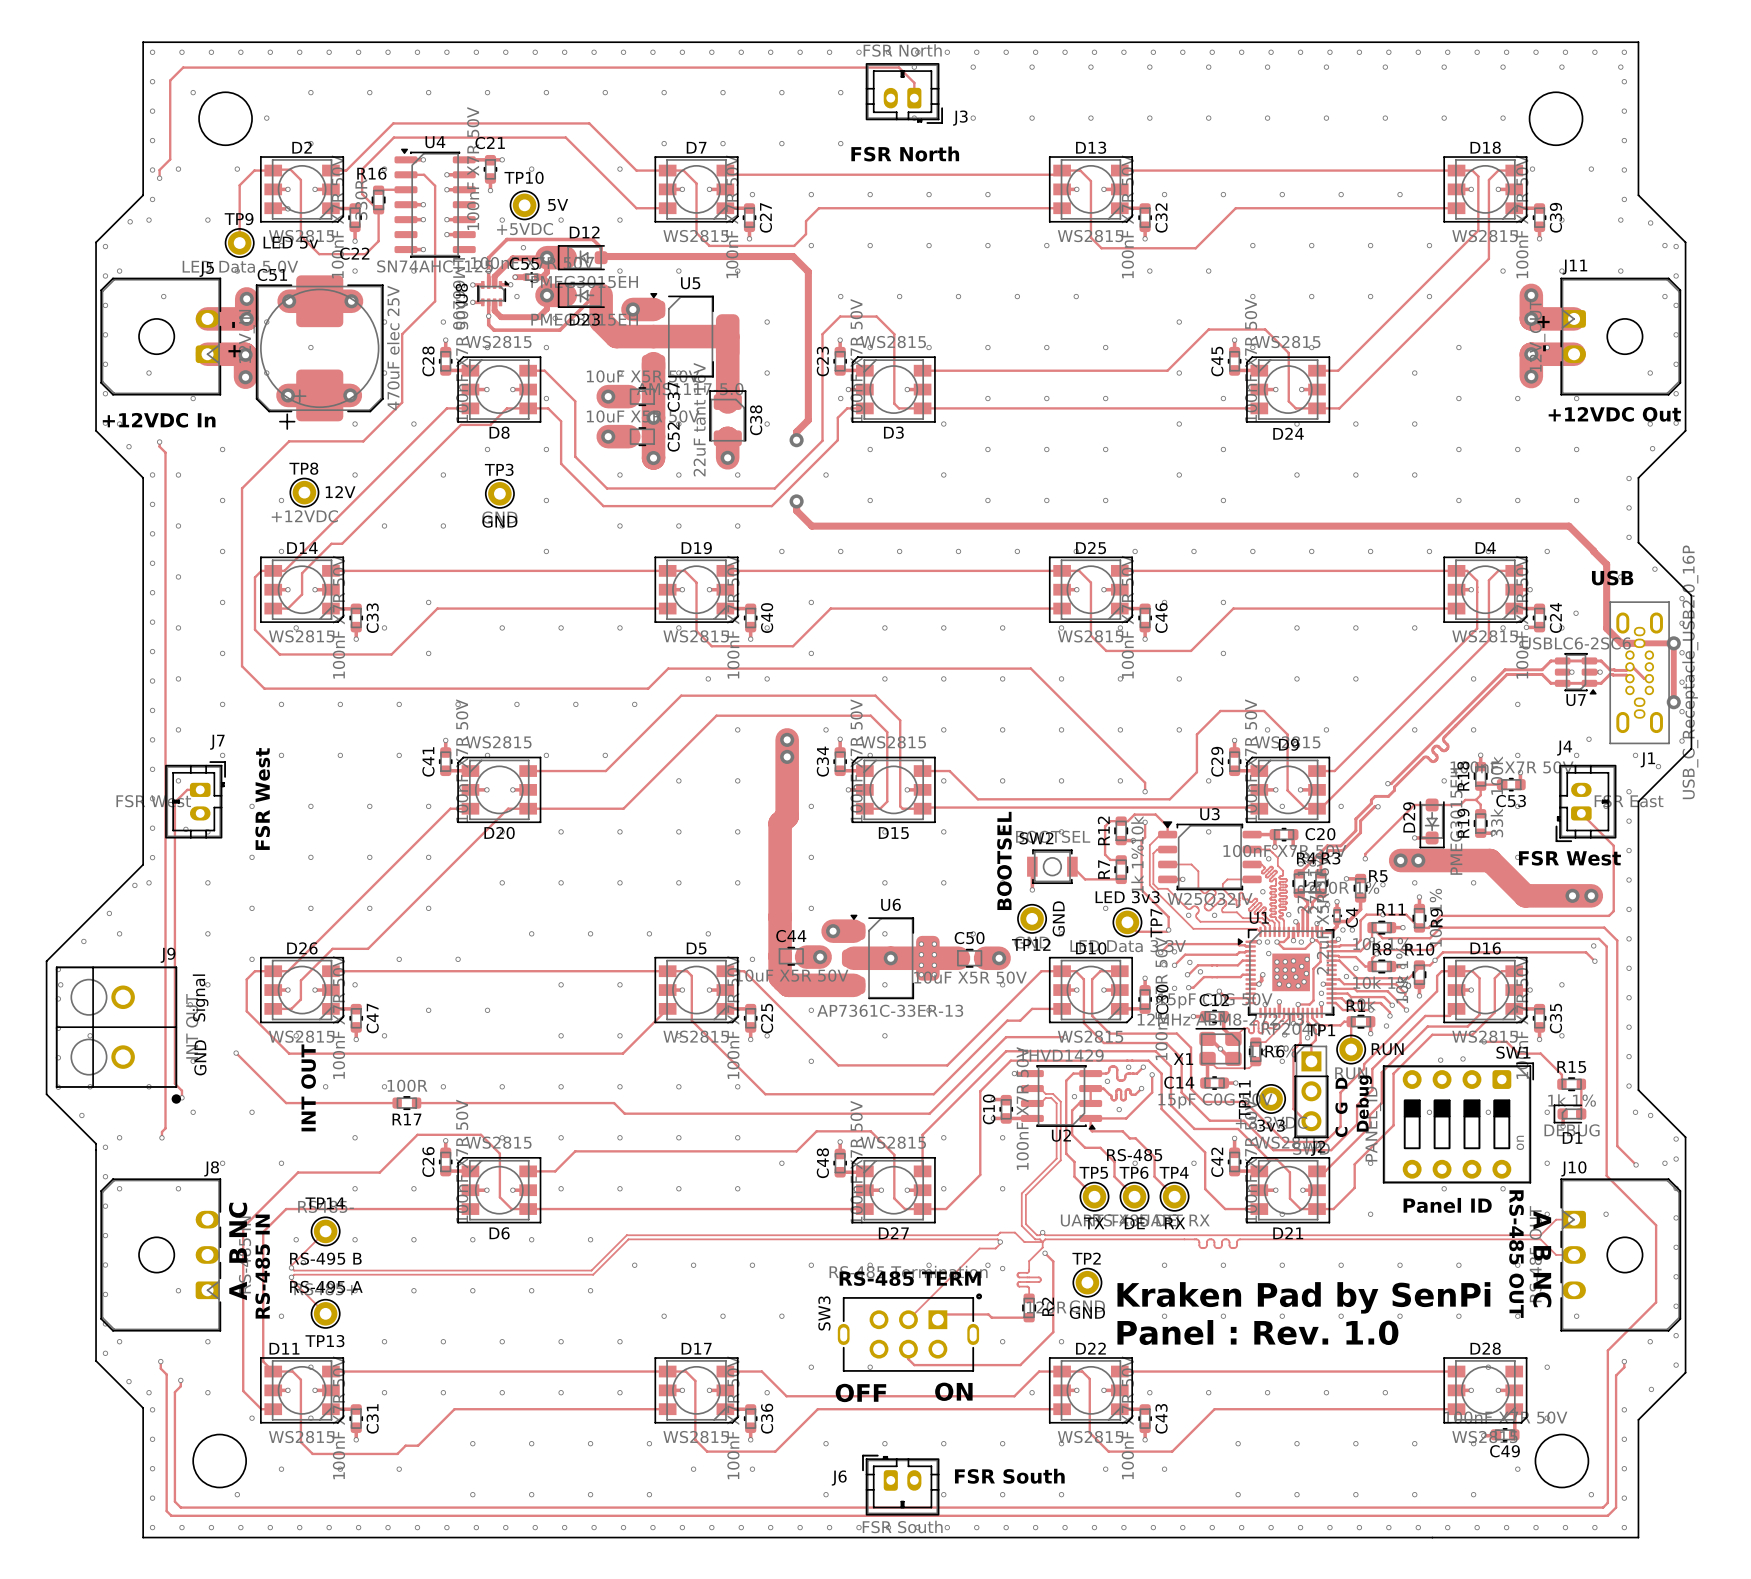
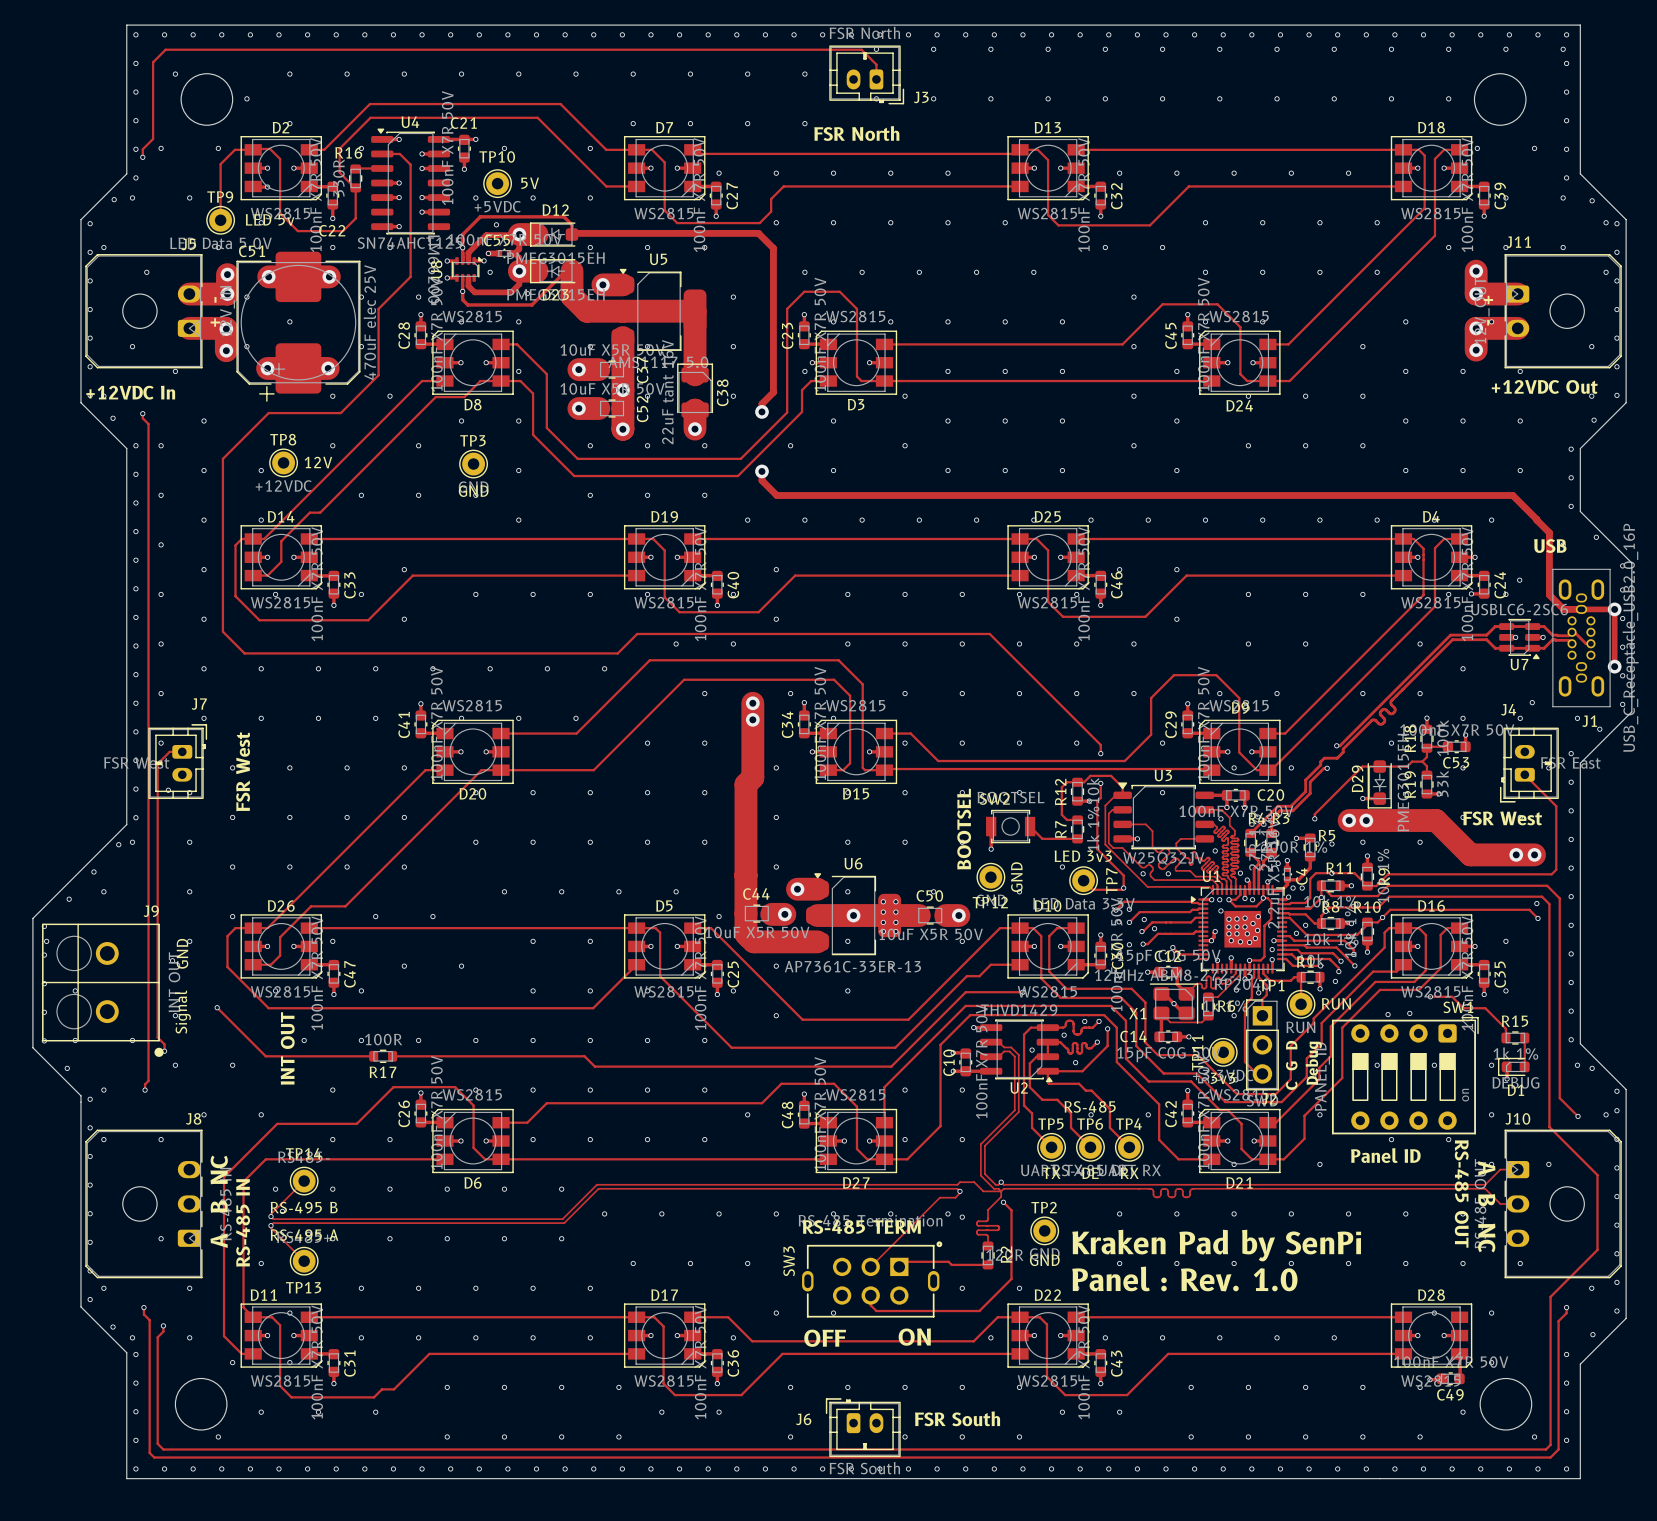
text: Signal (200, 997) -> GND (182, 953)
text: GND (200, 1057) -> Signal (182, 1012)

